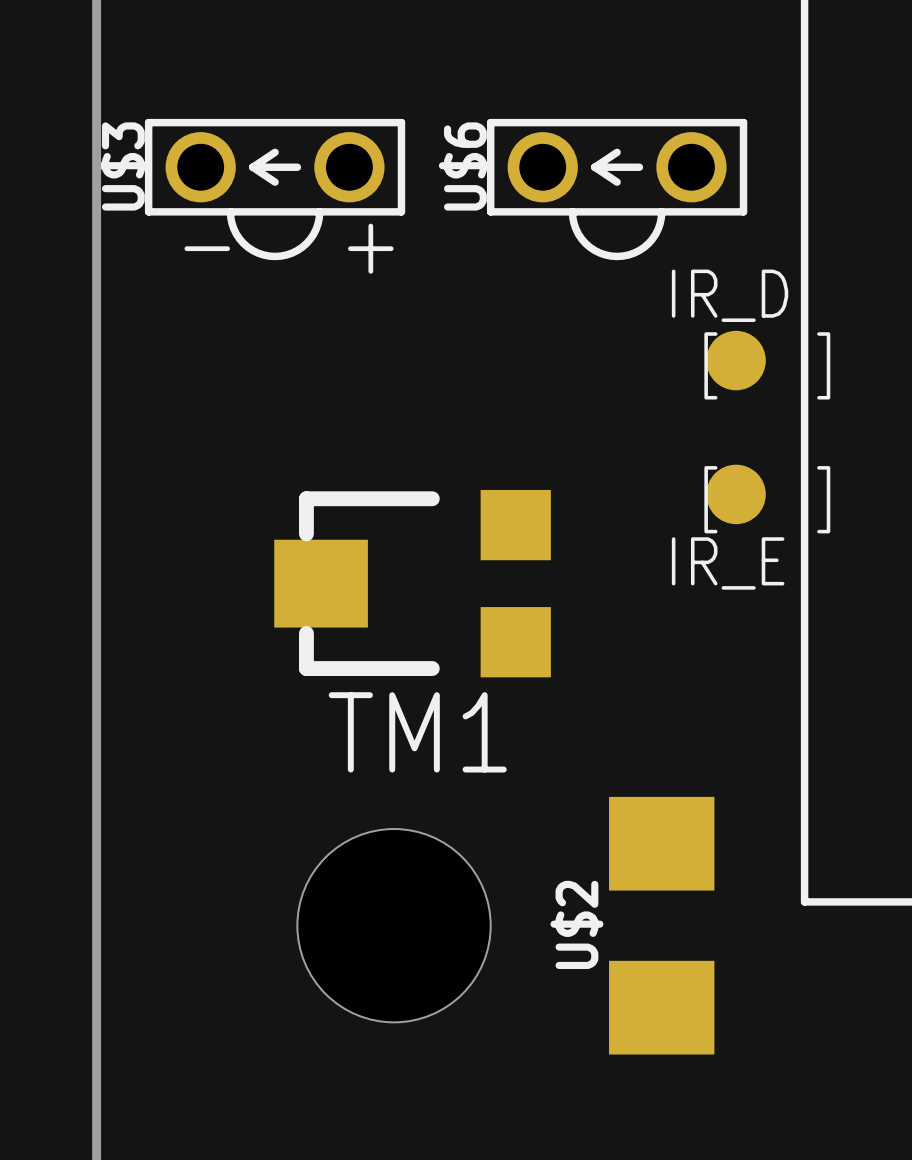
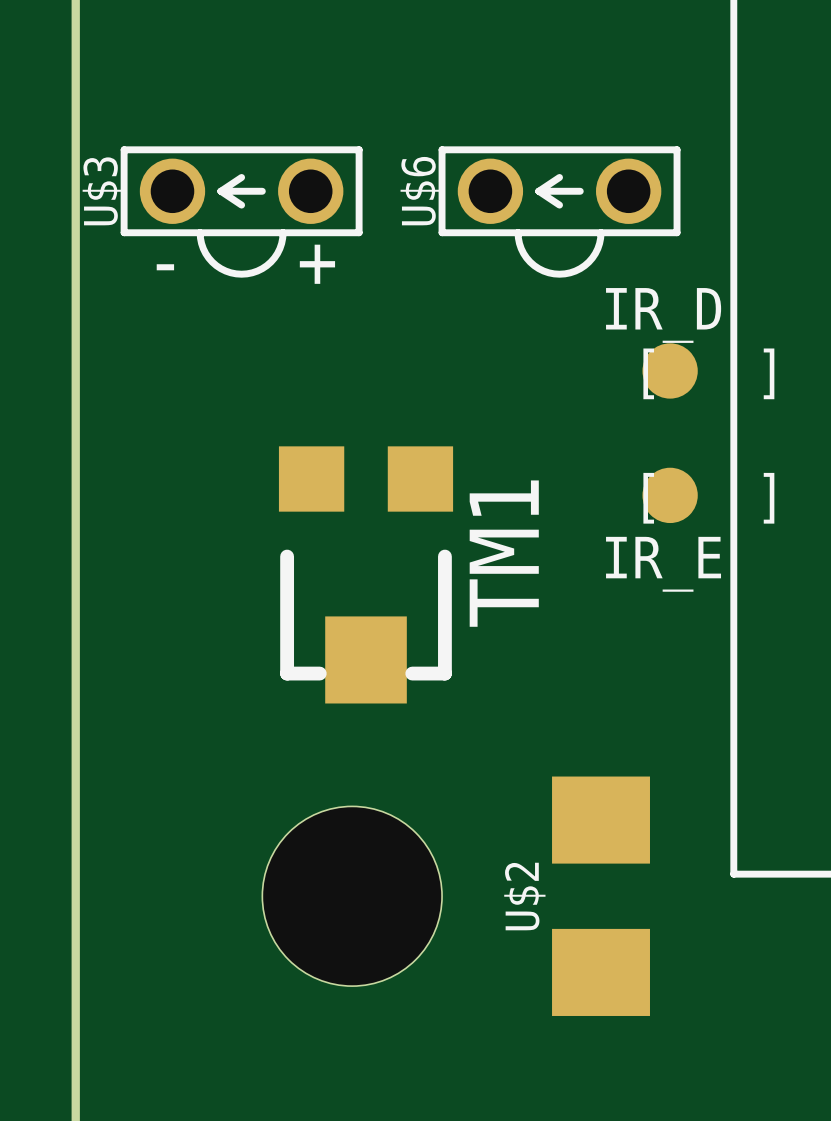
TM1 rotation: 0° (412, 583) -> 90° counterclockwise (366, 574)

